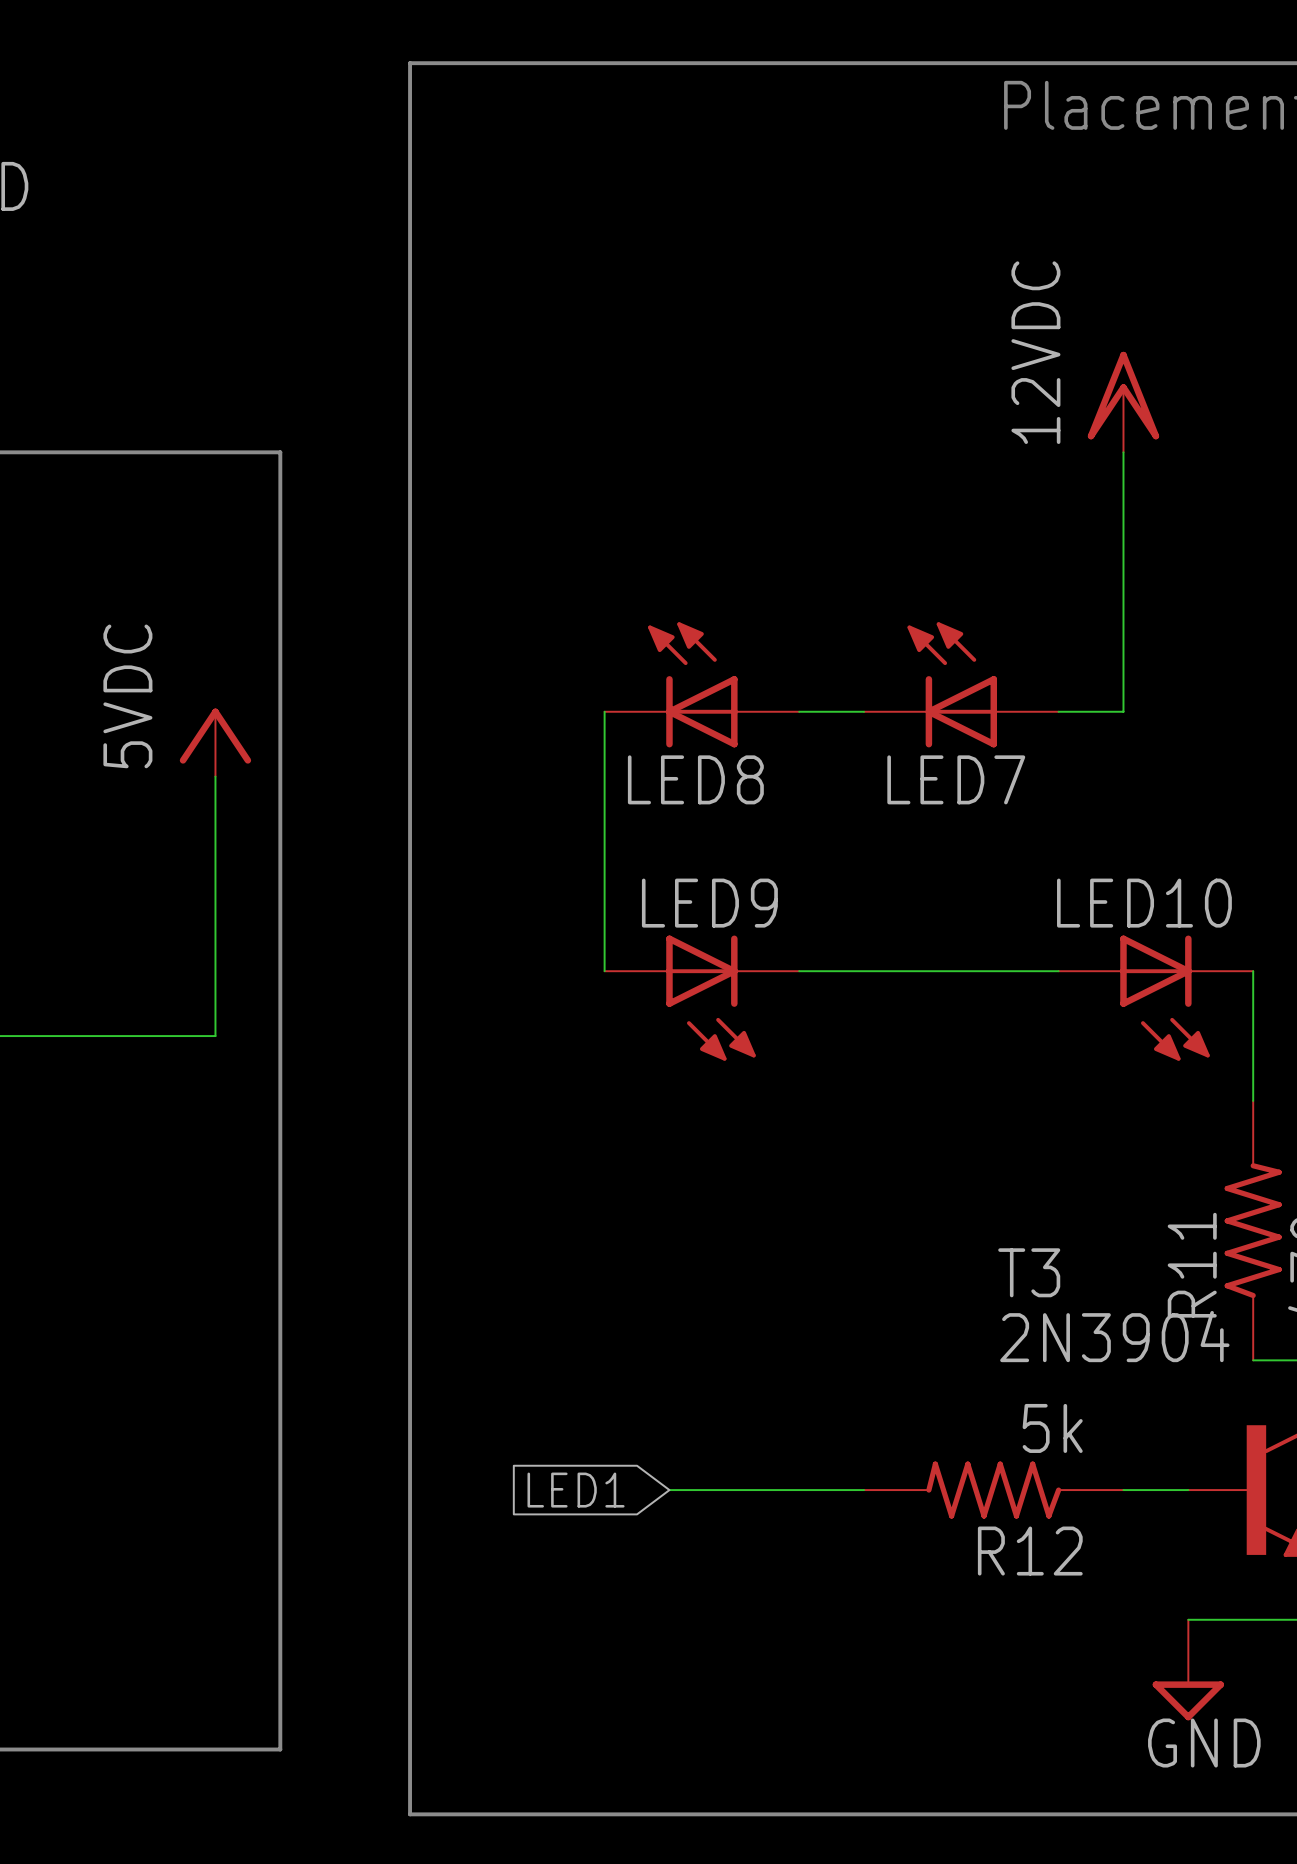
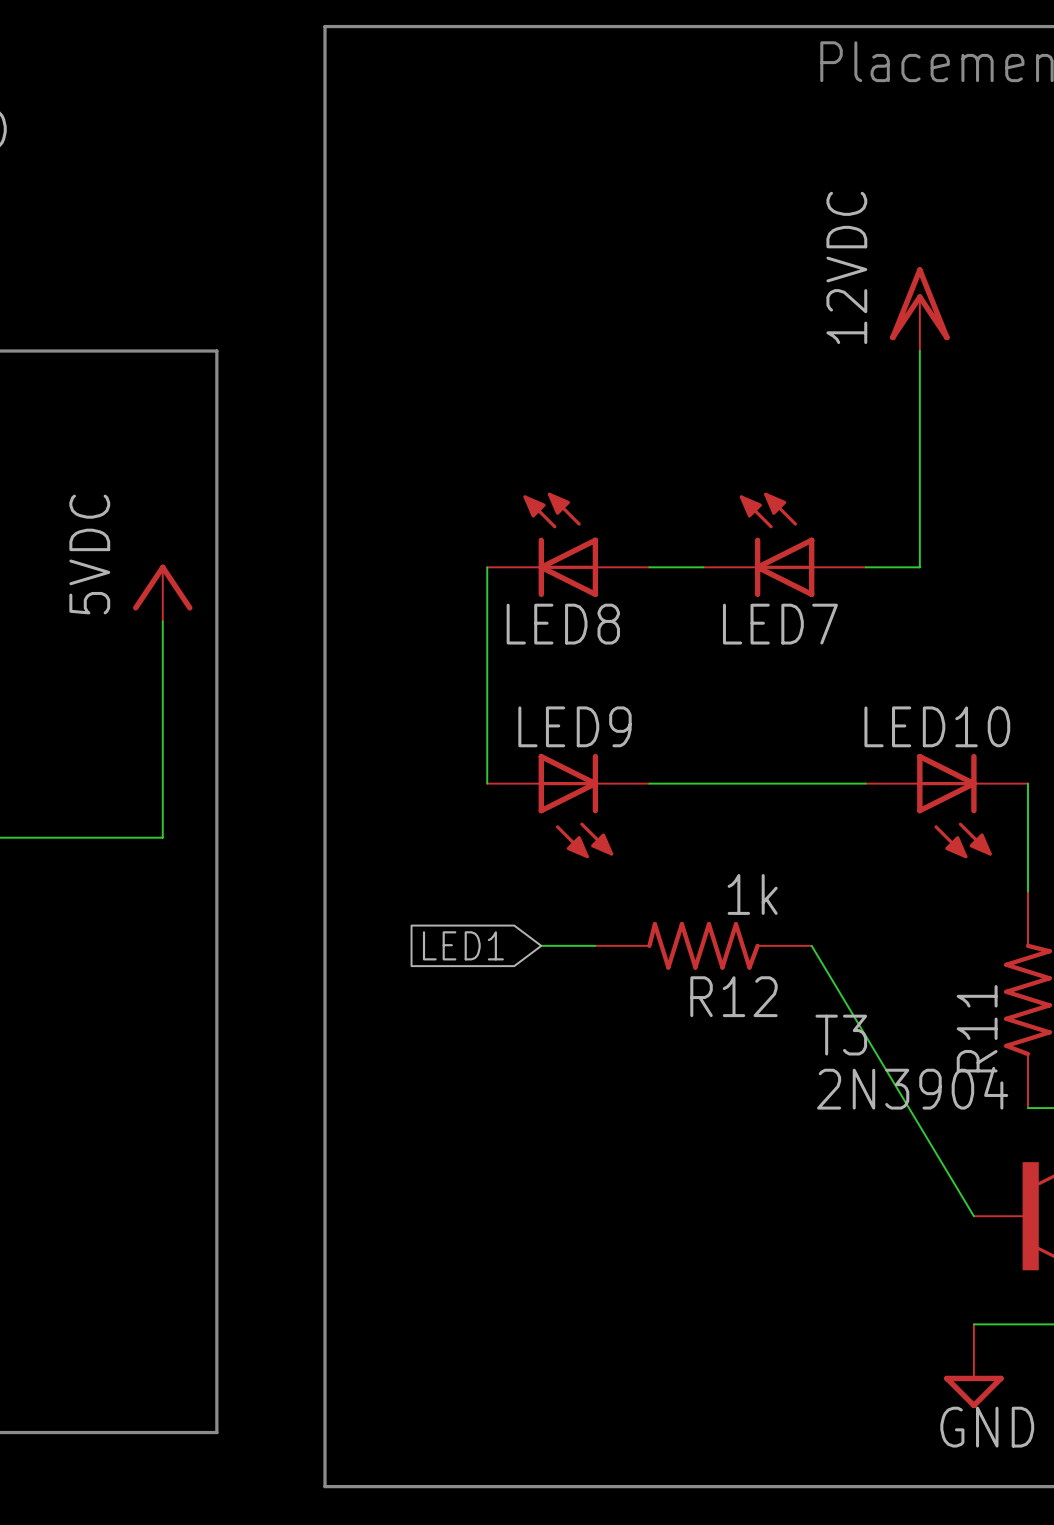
wire: none -> (541, 945) (595, 945)
R12 value: 5k (1052, 1428) -> 1k (752, 894)
global label position: LED1 (576, 1490) -> LED1 (463, 945)
wire: (669, 1490) (864, 1490) -> none
R12 position: (993, 1490) -> (703, 945)
wire: (1123, 1490) (1188, 1490) -> (811, 945) (973, 1216)

